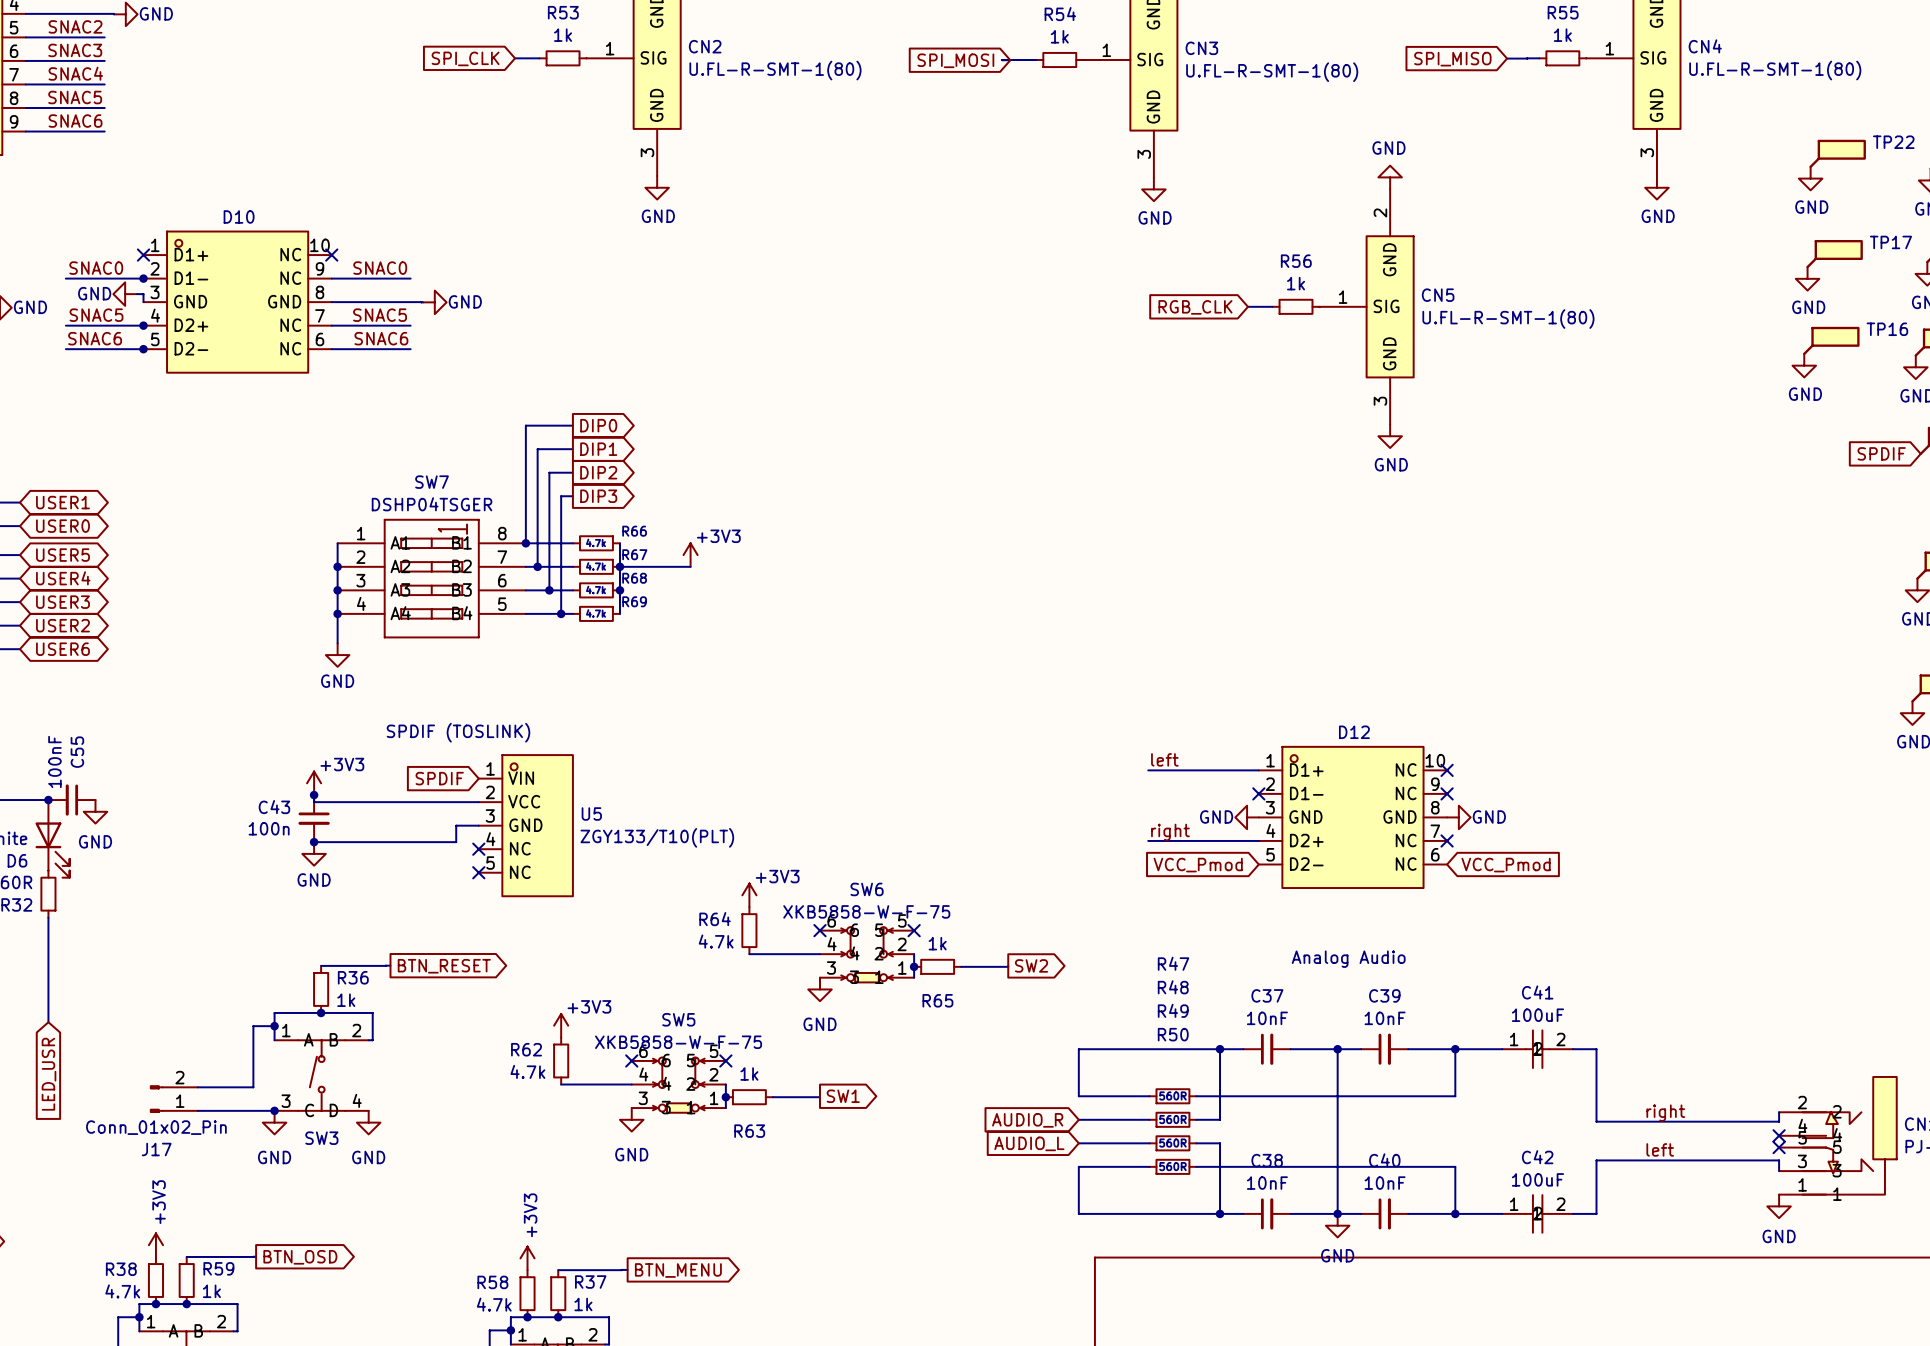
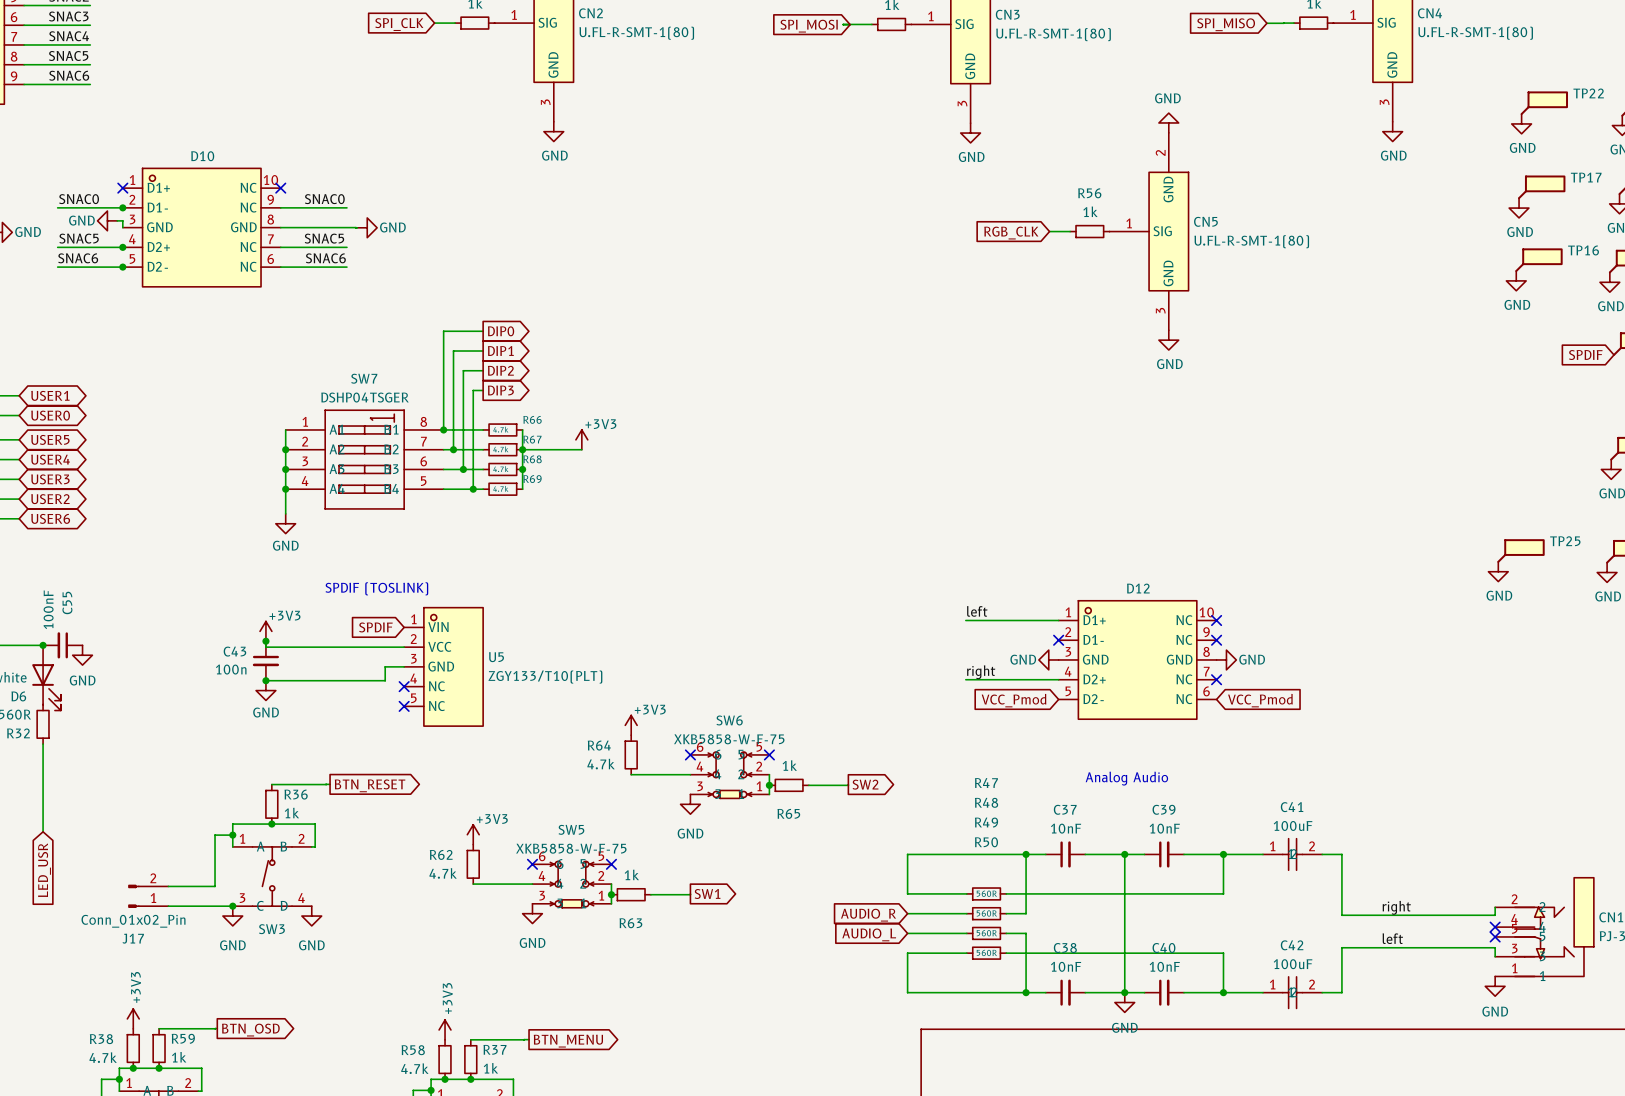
TP25: none -> (1521, 551)
power symbol: none -> GND (1498, 571)

